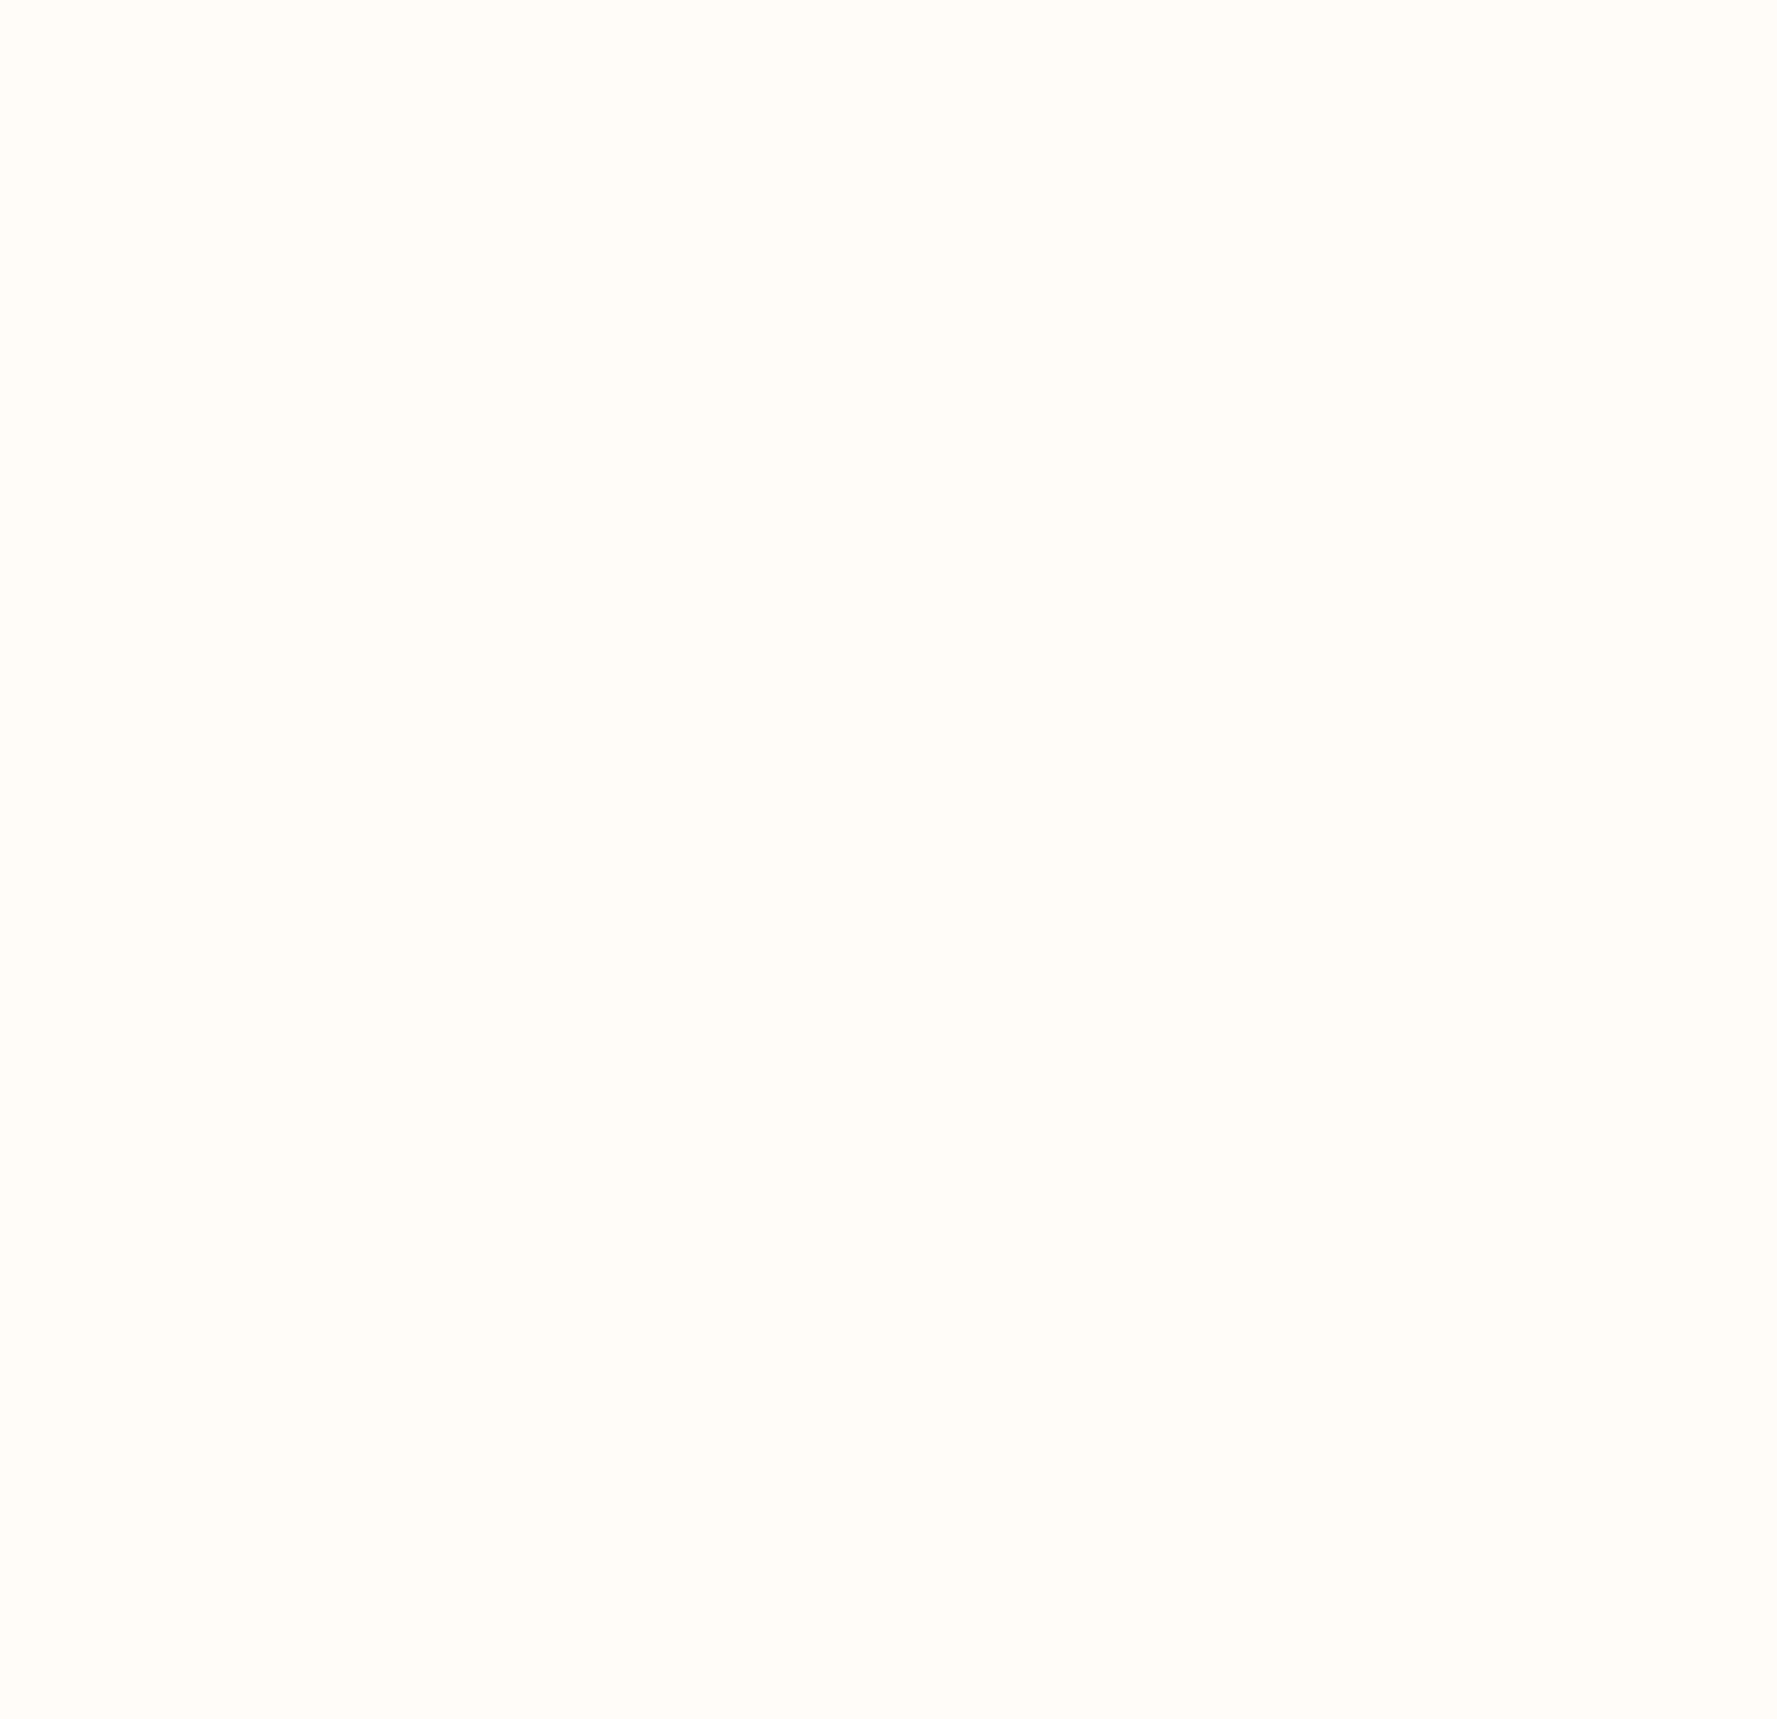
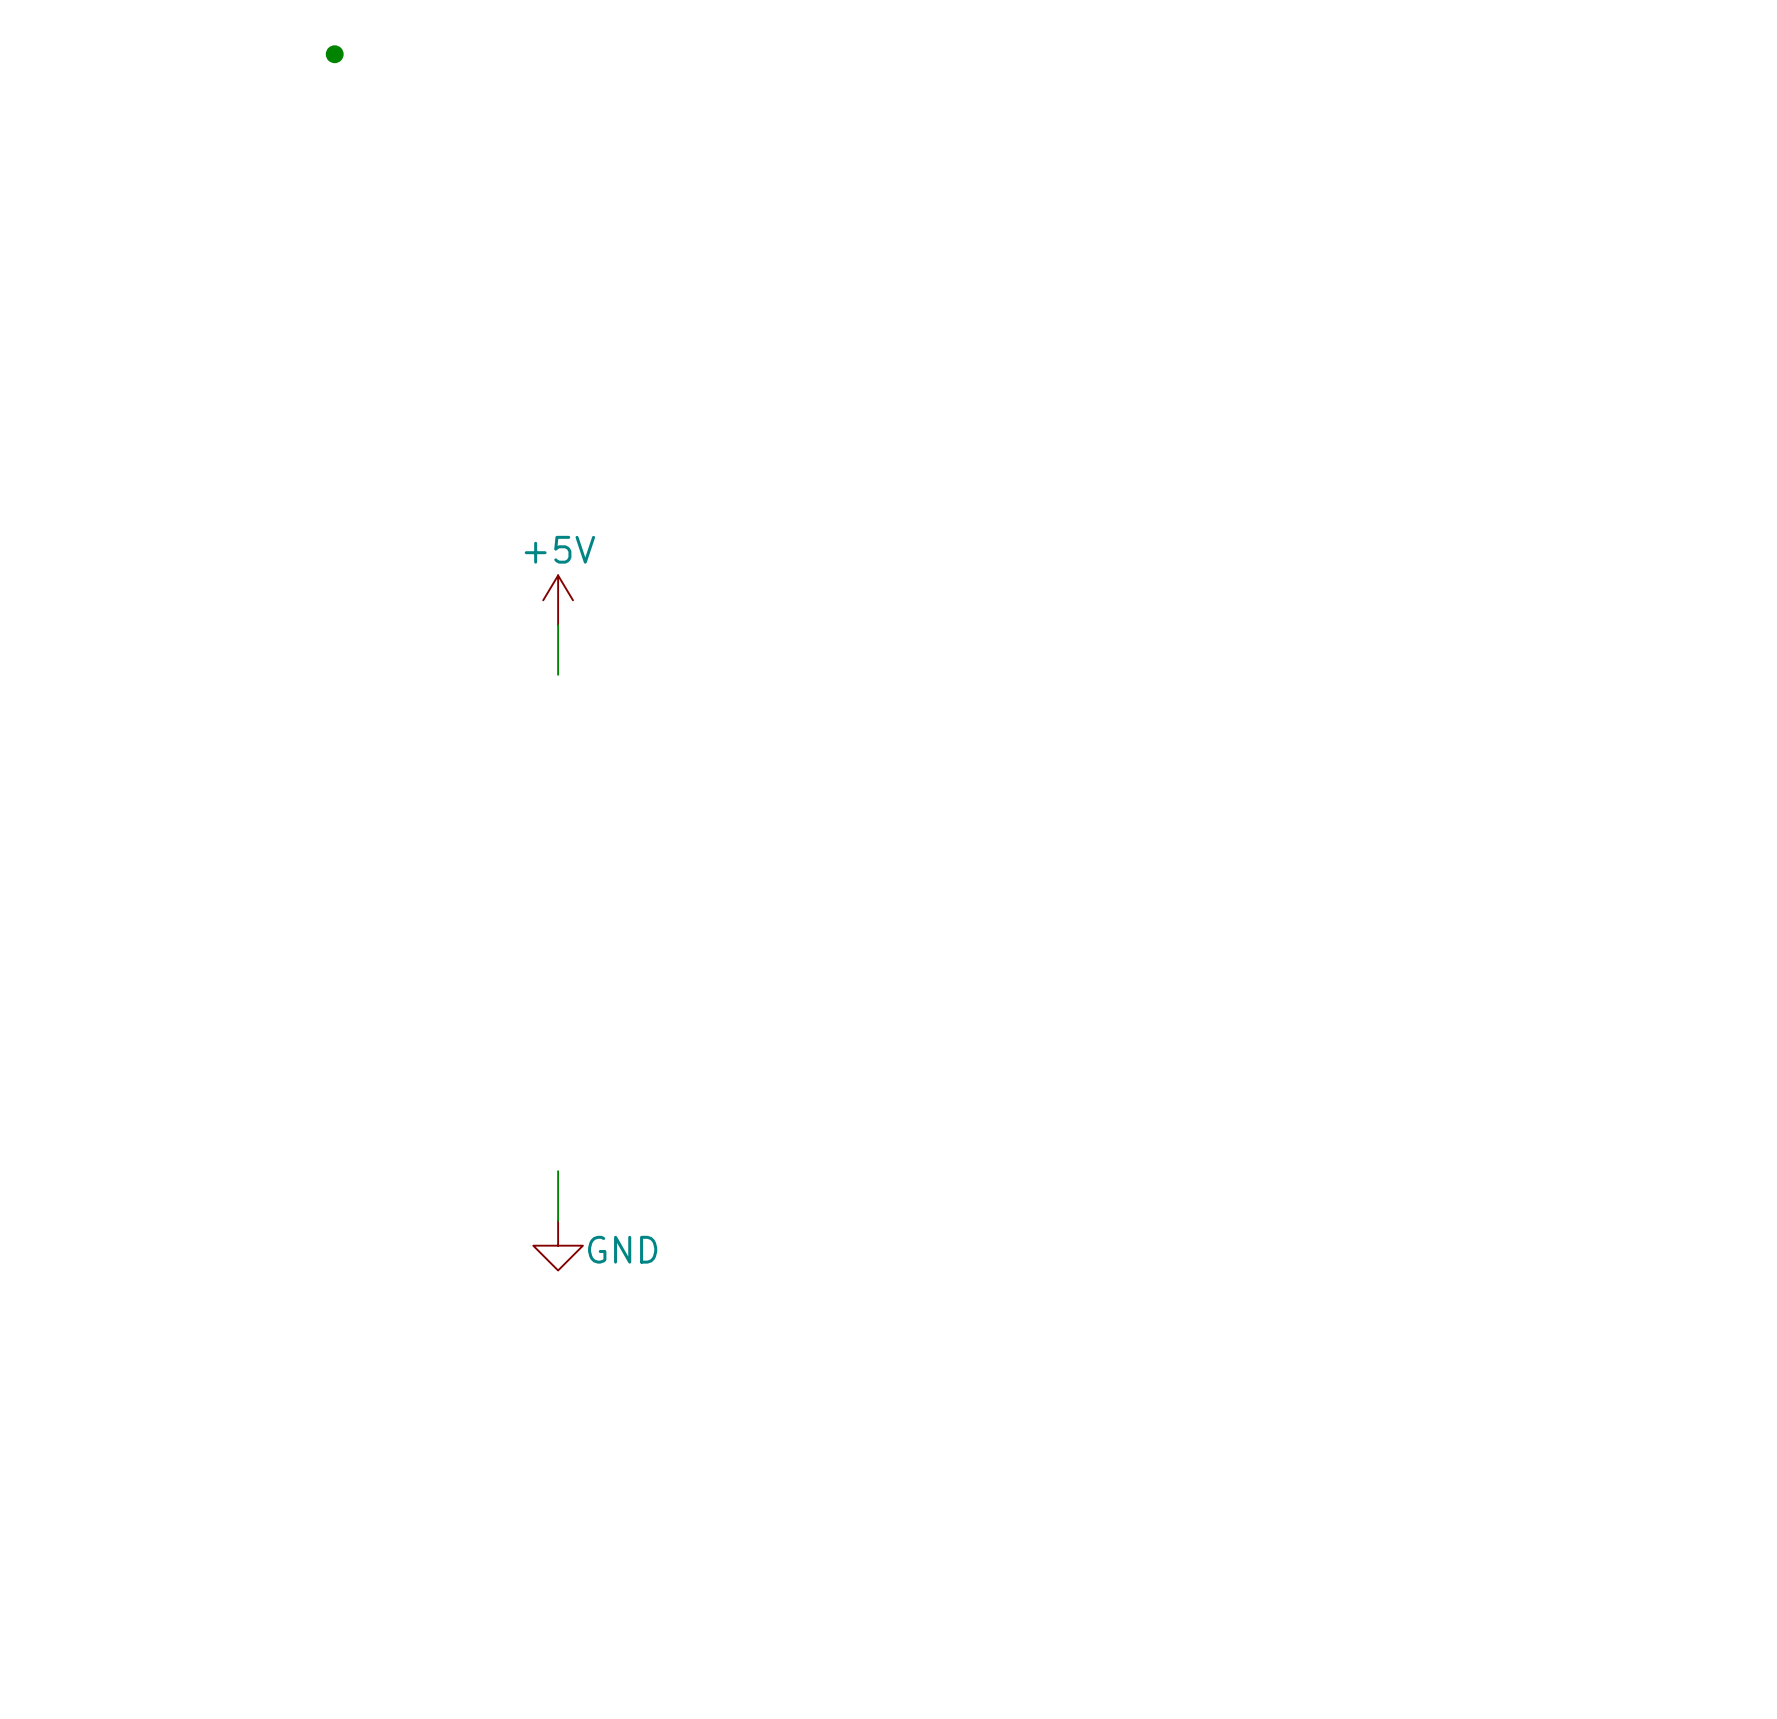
junction: none -> (334, 54)
power symbol: none -> +5V (558, 600)
wire: none -> (558, 625) (558, 674)
wire: none -> (558, 1171) (558, 1220)
power symbol: none -> GND (558, 1245)

